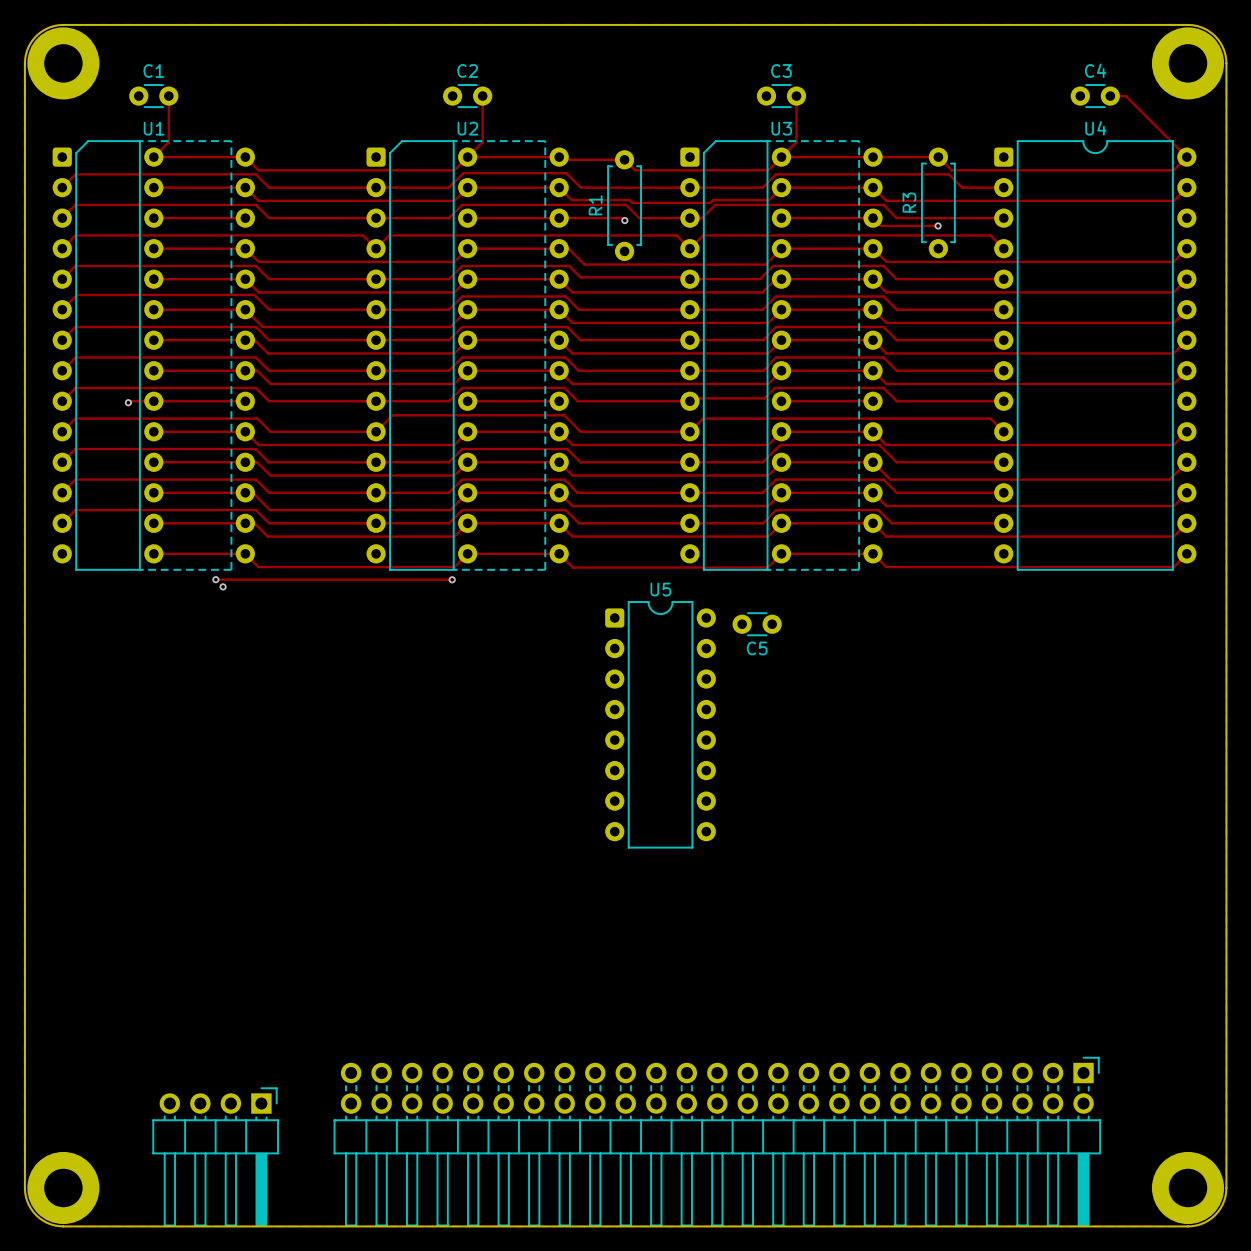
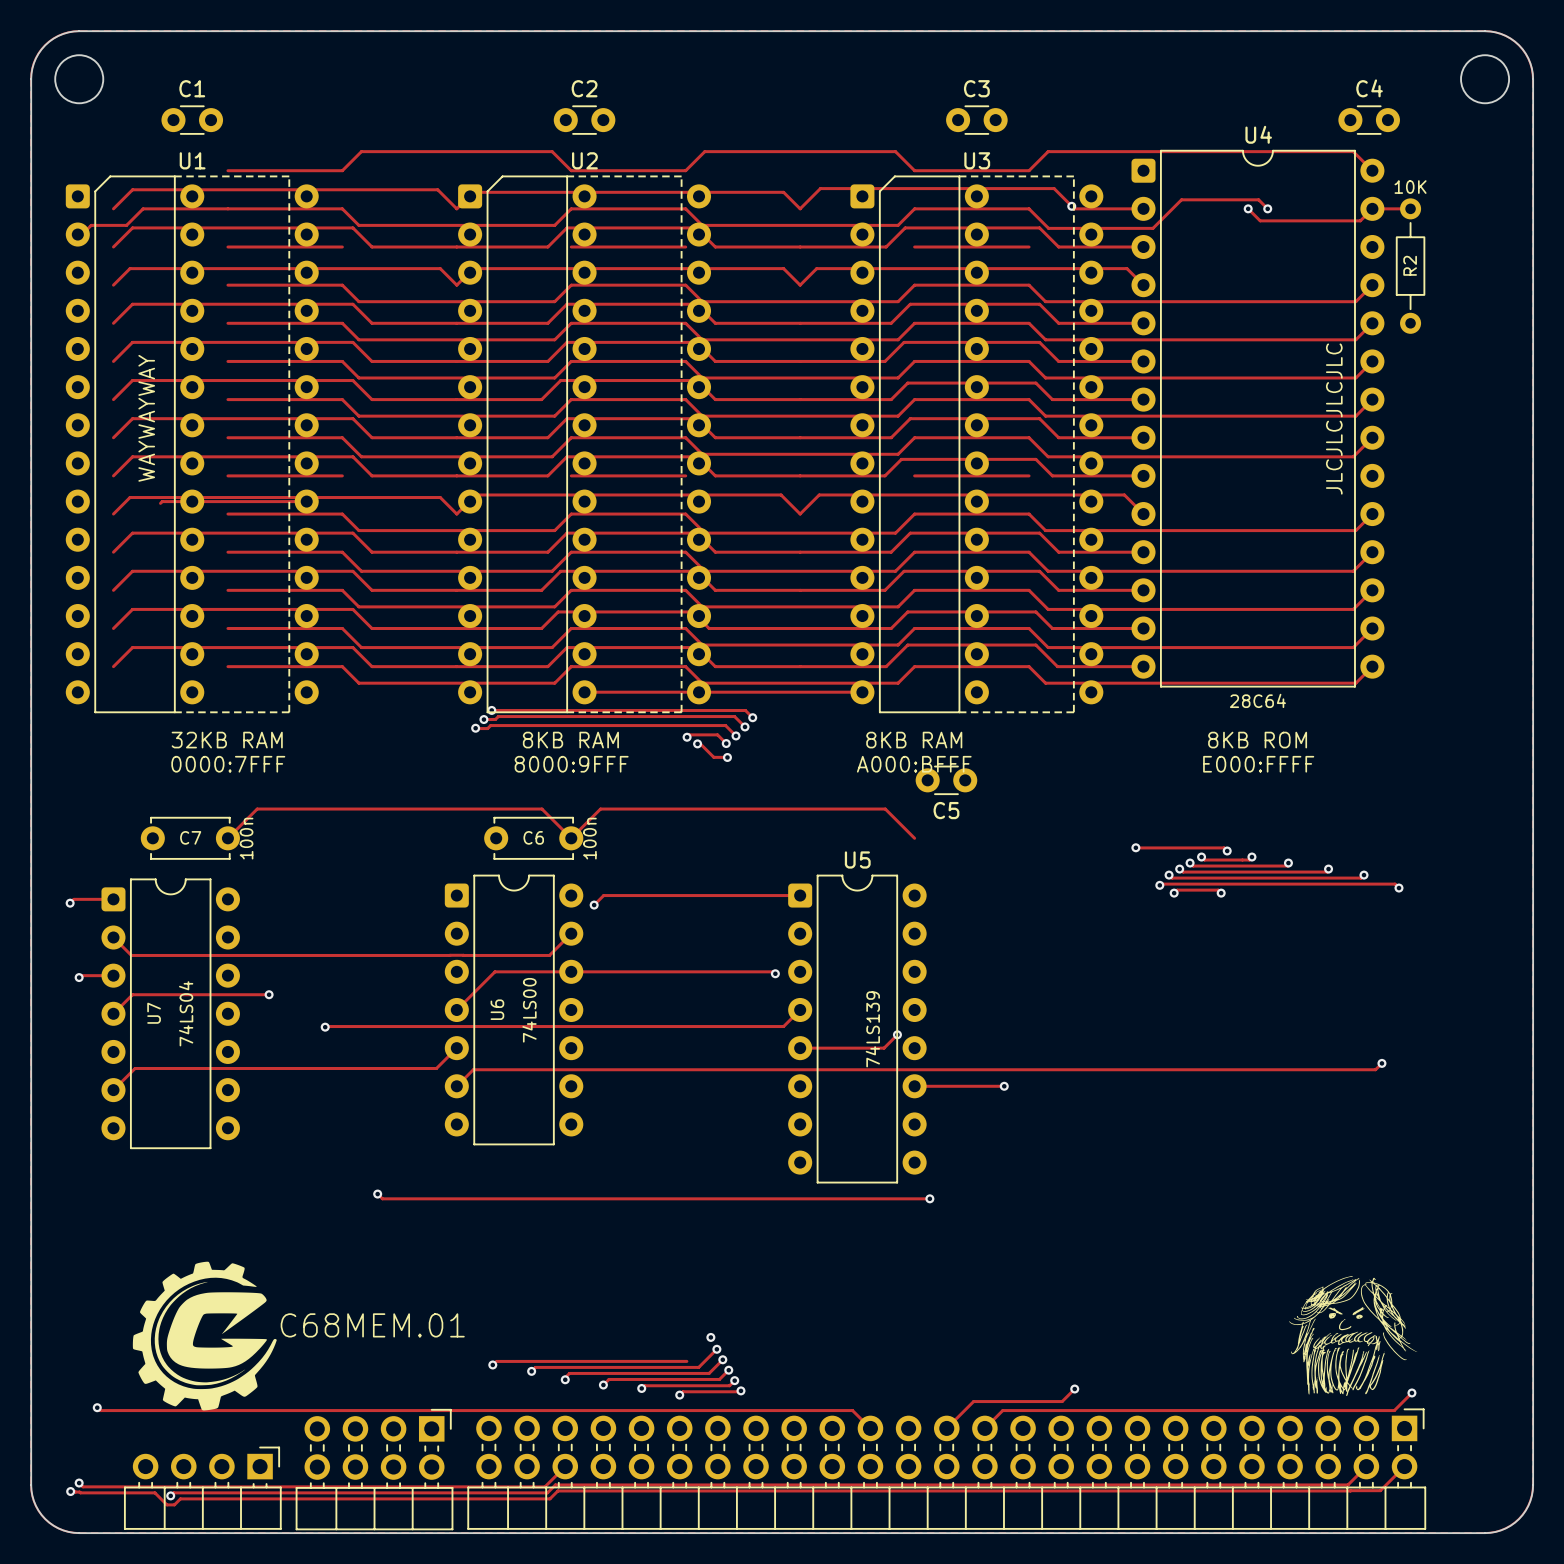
part footprint: [24, 24, 1227, 1227] -> [30, 30, 1534, 1534]
track: (168, 96) (168, 142) (153, 157) (245, 157) (258, 170) (454, 170) (482, 142) (482, 96) -> none
track: (796, 96) (796, 142) (768, 170) (635, 170) (624, 159) (561, 159) (559, 157) (467, 157) -> none
track: (1110, 96) (1125, 96) (1186, 157) (1173, 170) (951, 170) (938, 157) (781, 157) -> none
track: none -> (227, 170) (342, 170) (361, 151) (552, 151) (571, 170) (685, 170) (704, 151) (895, 151) (914, 170) (1029, 170) (1048, 151) (1353, 151) (1372, 170)
track: none -> (1071, 206) (1054, 188) (820, 188) (800, 208) (783, 192) (473, 192) (456, 208) (437, 189) (132, 189) (113, 208)
track: none -> (1071, 206) (1074, 208) (1143, 208)
via: none -> (1071, 206)
track: none -> (1248, 208) (1260, 220) (1360, 220) (1372, 208) (1410, 208)
via: none -> (1248, 208)
track: none -> (1267, 208) (1258, 199) (1181, 199) (1152, 228) (1048, 228) (1029, 208) (914, 208) (898, 225) (702, 225) (685, 208) (571, 208) (554, 225) (358, 225) (342, 208) (143, 208) (126, 225) (91, 225) (81, 235)
via: none -> (1267, 208)
track: (62, 187) (75, 174) (255, 174) (269, 187) (448, 187) (463, 173) (566, 173) (580, 187) (762, 187) (775, 174) (948, 174) (962, 187) (1003, 187) -> none
track: (153, 187) (245, 187) (258, 200) (454, 200) (467, 187) (559, 187) (571, 200) (629, 200) (632, 202) (710, 202) (713, 200) (768, 200) (781, 187) (873, 187) (886, 200) (1173, 200) (1186, 187) -> none
track: none -> (113, 247) (132, 227) (352, 227) (372, 247) (547, 247) (566, 227) (696, 227) (715, 247) (886, 247) (905, 227) (1039, 227) (1058, 247) (1143, 247)
track: none -> (571, 247) (685, 247)
track: none -> (914, 247) (1029, 247)
R3: (938, 202) -> none
R1: (624, 205) -> none
R2: none -> 10K (1410, 266)
track: (62, 218) (75, 204) (255, 204) (269, 218) (448, 218) (462, 204) (626, 204) (639, 218) (701, 218) (715, 204) (883, 204) (896, 218) (1003, 218) -> none
track: (153, 218) (245, 218) -> (227, 247) (342, 247)
track: (467, 218) (622, 218) (624, 220) -> none
track: (781, 218) (873, 218) (880, 225) (938, 225) -> none
via: (624, 220) -> none
via: (938, 225) -> none
track: none -> (113, 285) (130, 268) (440, 268) (456, 285) (473, 268) (783, 268) (800, 285) (816, 268) (1126, 268) (1143, 285)
track: none -> (227, 285) (342, 285) (358, 301) (554, 301) (571, 285) (685, 285) (702, 301) (898, 301) (914, 285) (1029, 285) (1045, 301) (1355, 301) (1372, 285)
track: (62, 248) (75, 235) (362, 235) (376, 248) (389, 235) (676, 235) (689, 248) (703, 235) (990, 235) (1003, 248) -> none
track: (153, 248) (245, 248) (258, 261) (454, 261) (467, 248) (568, 248) (584, 264) (765, 264) (781, 248) (873, 248) (886, 261) (1173, 261) (1186, 248) -> none
track: none -> (113, 323) (132, 304) (352, 304) (372, 323) (547, 323) (566, 304) (696, 304) (715, 323) (891, 323) (910, 304) (1039, 304) (1058, 323) (1143, 323)
track: none -> (227, 323) (342, 323) (358, 339) (554, 339) (571, 323) (685, 323) (702, 339) (898, 339) (914, 323) (1029, 323) (1045, 339) (1355, 339) (1372, 323)
track: (62, 279) (75, 265) (255, 265) (269, 279) (448, 279) (462, 265) (569, 265) (580, 277) (759, 279) (773, 265) (883, 265) (896, 279) (1003, 279) -> none
track: (153, 279) (245, 279) (258, 292) (454, 292) (467, 279) (559, 279) (572, 292) (762, 292) (775, 279) (873, 279) (886, 292) (1173, 292) (1186, 279) -> none
track: none -> (113, 361) (132, 342) (352, 342) (372, 361) (547, 361) (566, 342) (696, 342) (715, 361) (884, 361) (904, 342) (1039, 342) (1058, 361) (1143, 361)
track: none -> (227, 361) (342, 361) (358, 377) (554, 377) (571, 361) (685, 361) (702, 377) (898, 377) (914, 361) (1029, 361) (1045, 377) (1355, 377) (1372, 361)
track: (62, 309) (77, 294) (254, 294) (269, 309) (448, 309) (462, 296) (565, 296) (578, 309) (762, 309) (776, 296) (883, 296) (896, 309) (1003, 309) -> none
track: (153, 309) (245, 309) (262, 326) (450, 326) (467, 309) (559, 309) (572, 322) (768, 322) (781, 309) (873, 309) (886, 322) (1173, 322) (1186, 309) -> none
track: none -> (113, 399) (132, 380) (352, 380) (372, 399) (541, 399) (560, 380) (696, 380) (715, 399) (891, 399) (907, 383) (1035, 383) (1052, 399) (1143, 399)
track: none -> (227, 399) (342, 399) (358, 416) (554, 416) (571, 399) (685, 399) (702, 416) (898, 416) (914, 399) (1029, 399) (1045, 416) (1355, 416) (1372, 399)
text: none -> WAYWAYWAY (146, 418)
text: none -> JLCJLCJLCJLC (1334, 419)
track: (62, 340) (75, 326) (255, 326) (269, 340) (448, 340) (462, 326) (567, 326) (580, 340) (763, 340) (775, 326) (883, 326) (896, 340) (1003, 340) -> none
track: (153, 340) (254, 340) (268, 353) (454, 353) (467, 340) (559, 340) (572, 353) (768, 353) (781, 340) (873, 340) (886, 353) (1173, 353) (1186, 340) -> none
track: none -> (113, 437) (132, 418) (352, 418) (372, 437) (547, 437) (566, 418) (696, 418) (715, 437) (891, 437) (910, 418) (1039, 418) (1058, 437) (1143, 437)
track: none -> (227, 437) (342, 437) (361, 456) (552, 456) (571, 437) (685, 437) (702, 454) (898, 454) (914, 437) (1029, 437) (1048, 456) (1353, 456) (1372, 437)
U4 position: (1095, 355) -> (1257, 418)
track: (62, 370) (75, 357) (255, 357) (269, 370) (448, 370) (462, 357) (565, 357) (578, 370) (763, 370) (775, 357) (883, 357) (896, 370) (1003, 370) -> none
track: (153, 370) (257, 370) (270, 383) (454, 383) (467, 370) (559, 370) (572, 383) (768, 383) (781, 370) (873, 370) (886, 383) (1173, 383) (1186, 370) -> none
track: none -> (113, 475) (132, 456) (352, 456) (372, 475) (547, 475) (566, 456) (696, 456) (715, 475) (884, 475) (901, 459) (1035, 459) (1052, 475) (1143, 475)
track: none -> (227, 475) (342, 475)
track: (572, 395) (564, 388) (462, 388) (448, 401) (269, 401) (255, 388) (75, 388) (62, 401) -> none
track: (572, 395) (577, 401) (689, 401) (692, 398) (764, 398) (774, 388) (883, 388) (896, 401) (1003, 401) -> none
track: (467, 401) (559, 401) -> (571, 475) (685, 475)
track: (781, 401) (873, 401) -> (914, 475) (1029, 475)
via: (128, 402) -> none
track: none -> (113, 514) (130, 497) (440, 497) (456, 514) (475, 494) (781, 494) (800, 514) (819, 494) (1124, 494) (1143, 514)
track: none -> (227, 514) (342, 514) (358, 530) (554, 530) (571, 514) (685, 514) (704, 533) (895, 533) (914, 514) (1029, 514) (1045, 530) (1355, 530) (1372, 514)
track: (62, 431) (75, 418) (257, 418) (270, 431) (376, 431) (392, 415) (564, 415) (580, 431) (689, 431) (703, 418) (990, 418) (1003, 431) -> none
track: (153, 431) (245, 431) (258, 445) (454, 445) (467, 431) (559, 431) (572, 445) (768, 445) (781, 431) (873, 431) (886, 445) (1173, 445) (1186, 431) -> none
track: none -> (113, 552) (132, 533) (352, 533) (372, 552) (547, 552) (566, 533) (696, 533) (715, 552) (891, 552) (910, 533) (1039, 533) (1058, 552) (1143, 552)
track: none -> (227, 552) (342, 552) (361, 571) (552, 571) (571, 552) (685, 552) (704, 571) (895, 571) (914, 552) (1029, 552) (1048, 571) (1353, 571) (1372, 552)
track: (62, 462) (75, 449) (255, 449) (268, 462) (448, 462) (462, 449) (567, 449) (580, 462) (762, 462) (780, 445) (879, 445) (896, 462) (1003, 462) -> none
track: (153, 462) (257, 462) (270, 475) (454, 475) (467, 462) (559, 462) (572, 475) (768, 475) (781, 462) (873, 462) (890, 479) (1169, 479) (1186, 462) -> none
track: none -> (113, 590) (132, 571) (352, 571) (372, 590) (541, 590) (560, 571) (696, 571) (715, 590) (884, 590) (904, 571) (1039, 571) (1058, 590) (1143, 590)
track: none -> (227, 590) (342, 590) (358, 606) (554, 606) (571, 590) (685, 590) (702, 606) (898, 606) (914, 590) (1029, 590) (1048, 609) (1353, 609) (1372, 590)
track: (62, 492) (75, 479) (255, 479) (269, 492) (448, 492) (462, 479) (564, 479) (577, 492) (762, 492) (775, 479) (883, 479) (896, 492) (1003, 492) -> none
track: (153, 492) (252, 492) (269, 510) (450, 510) (467, 492) (559, 492) (572, 506) (768, 506) (781, 492) (873, 492) (886, 506) (1173, 506) (1186, 492) -> none
track: none -> (113, 628) (132, 609) (352, 609) (372, 628) (541, 628) (558, 611) (692, 611) (709, 628) (891, 628) (907, 611) (1035, 611) (1052, 628) (1143, 628)
track: none -> (227, 628) (342, 628) (361, 647) (552, 647) (571, 628) (685, 628) (702, 645) (898, 645) (914, 628) (1029, 628) (1048, 647) (1353, 647) (1372, 628)
track: (62, 523) (75, 510) (255, 510) (269, 523) (448, 523) (462, 510) (565, 510) (578, 523) (763, 523) (775, 510) (878, 510) (891, 523) (1003, 523) -> none
track: (153, 523) (254, 523) (267, 536) (454, 536) (467, 523) (559, 523) (572, 536) (768, 536) (781, 523) (873, 523) (886, 536) (1173, 536) (1186, 523) -> none
track: none -> (113, 666) (132, 647) (352, 647) (372, 666) (547, 666) (566, 647) (696, 647) (715, 666) (886, 666) (907, 645) (1035, 645) (1057, 666) (1143, 666)
track: none -> (227, 666) (342, 666) (358, 683) (554, 683) (571, 666) (685, 666) (702, 683) (898, 683) (914, 666) (1029, 666) (1045, 683) (1355, 683) (1372, 666)
track: (153, 553) (245, 553) (258, 567) (454, 567) (467, 553) (559, 553) (572, 567) (767, 567) (781, 553) (873, 553) (886, 567) (1173, 567) (1186, 553) -> none
track: none -> (857, 692) (592, 693)
U4 value: none -> 28C64 (1257, 700)
track: none -> (491, 710) (745, 710) (752, 717)
via: none -> (491, 710)
via: none -> (752, 717)
track: none -> (483, 719) (495, 719) (498, 716) (734, 716) (745, 726)
via: none -> (483, 719)
track: (215, 579) (452, 579) -> none
via: (215, 579) -> none
via: (452, 579) -> none
via: none -> (745, 726)
via: none -> (475, 728)
track: none -> (478, 728) (478, 728) (475, 728) (475, 728) (487, 728) (490, 725) (725, 725) (736, 735)
via: (223, 586) -> none
via: none -> (736, 735)
track: none -> (687, 737) (689, 734) (717, 734) (726, 743)
via: none -> (687, 737)
text: none -> 32KB RAM (227, 740)
text: none -> 8KB RAM (570, 740)
text: none -> 8KB RAM (914, 740)
text: none -> 8KB ROM (1257, 740)
via: none -> (726, 743)
track: none -> (697, 743) (700, 743) (713, 757) (725, 757)
via: none -> (697, 743)
via: none -> (727, 757)
text: none -> 0000:7FFF (228, 764)
text: none -> 8000:9FFF (571, 764)
text: none -> A000:BFFF (914, 764)
text: none -> E000:FFFF (1258, 764)
C7: none -> 100n (190, 838)
track: none -> (227, 838) (257, 809) (541, 809) (571, 838) (600, 809) (885, 809) (914, 838)
C6: none -> 100n (533, 838)
track: none -> (1136, 847) (1224, 847) (1227, 850)
via: none -> (1135, 847)
via: none -> (1227, 850)
track: none -> (1201, 857) (1204, 860) (1249, 860) (1251, 857)
via: none -> (1201, 857)
via: none -> (1251, 857)
track: none -> (1190, 863) (1193, 866) (1287, 866) (1288, 863)
via: none -> (1190, 863)
via: none -> (1288, 863)
track: none -> (1179, 869) (1183, 872) (1327, 872) (1328, 869)
via: none -> (1179, 869)
via: none -> (1328, 869)
track: none -> (1169, 875) (1172, 878) (1361, 878) (1364, 875) (1361, 875) (1361, 878)
via: none -> (1169, 875)
via: none -> (1364, 875)
track: none -> (1159, 885) (1395, 884) (1398, 888)
via: none -> (1159, 885)
via: none -> (1398, 888)
track: none -> (1174, 893) (1177, 890) (1218, 890) (1221, 893)
via: none -> (1174, 893)
via: none -> (1221, 893)
track: none -> (800, 895) (603, 895) (594, 905)
track: none -> (113, 899) (73, 899) (70, 903)
via: none -> (70, 903)
via: none -> (594, 905)
U5 position: (660, 724) -> (857, 1029)
track: none -> (571, 933) (549, 955) (463, 955)
track: none -> (113, 937) (131, 955) (449, 955)
track: none -> (449, 955) (463, 955)
track: none -> (775, 973) (773, 971) (494, 971) (456, 1009)
via: none -> (775, 973)
track: none -> (113, 975) (81, 975) (79, 977)
via: none -> (79, 977)
track: none -> (269, 994) (132, 994) (113, 1013)
via: none -> (269, 994)
U6: none -> 74LS00 (514, 1009)
track: none -> (800, 1009) (783, 1026) (325, 1027)
U7: none -> 74LS04 (170, 1013)
via: none -> (325, 1027)
U5 value: none -> 74LS139 (872, 1029)
track: none -> (897, 1034) (884, 1048) (800, 1048)
via: none -> (897, 1034)
track: none -> (456, 1048) (436, 1068) (135, 1068) (113, 1090)
track: none -> (1381, 1063) (1375, 1069) (473, 1069) (456, 1086)
via: none -> (1381, 1063)
track: none -> (914, 1086) (1004, 1086)
via: none -> (1004, 1086)
track: none -> (377, 1194) (382, 1198) (929, 1198)
via: none -> (377, 1194)
via: none -> (929, 1198)
drawing: none -> [132, 1261, 277, 1411]
drawing: none -> [1289, 1276, 1418, 1396]
text: none -> C68MEM.01 (372, 1325)
via: none -> (710, 1337)
track: none -> (716, 1349) (698, 1367) (535, 1367) (531, 1371)
via: none -> (716, 1349)
track: none -> (722, 1359) (709, 1373) (569, 1373) (565, 1379)
via: none -> (722, 1359)
track: none -> (496, 1361) (686, 1361)
via: none -> (492, 1364)
track: none -> (728, 1370) (719, 1379) (608, 1379) (603, 1385)
via: none -> (728, 1370)
via: none -> (531, 1371)
via: none -> (565, 1379)
track: none -> (734, 1380) (729, 1385) (644, 1385) (641, 1388)
via: none -> (734, 1380)
via: none -> (603, 1385)
via: none -> (641, 1388)
track: none -> (1074, 1389) (1062, 1401) (973, 1401) (946, 1428)
via: none -> (1074, 1389)
track: none -> (740, 1390) (683, 1391) (679, 1395)
via: none -> (740, 1390)
track: none -> (1411, 1392) (1394, 1410) (1002, 1410) (984, 1428)
via: none -> (1411, 1392)
via: none -> (679, 1395)
track: none -> (97, 1407) (100, 1410) (852, 1410) (870, 1428)
via: none -> (97, 1407)
track: none -> (565, 1466) (544, 1486) (82, 1486) (79, 1483)
track: none -> (1366, 1466) (1348, 1484) (555, 1484) (547, 1492) (173, 1492) (170, 1495)
track: none -> (1404, 1466) (1380, 1490) (557, 1490) (549, 1498) (180, 1498) (174, 1504) (166, 1504) (154, 1492) (70, 1491)
via: none -> (79, 1483)
via: none -> (70, 1491)
via: none -> (170, 1495)

